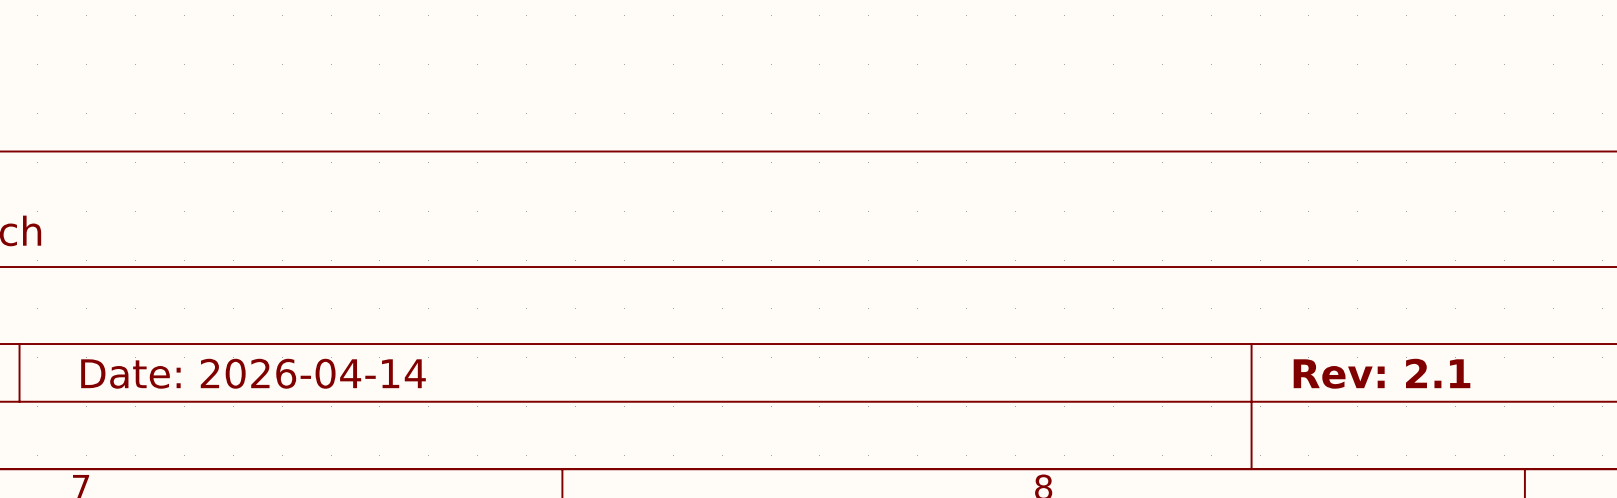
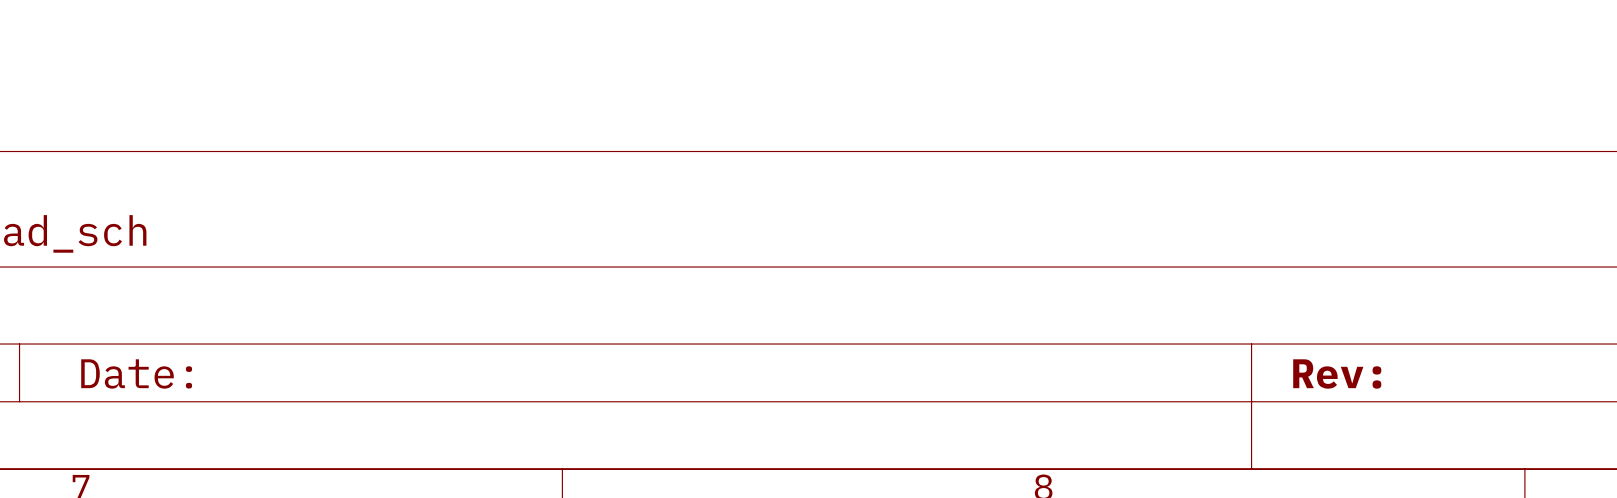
title block: Date: 2026-04-14 (253, 373) -> Date: (136, 373)
title block: Rev: 2.1 (1382, 373) -> Rev: (1337, 373)

